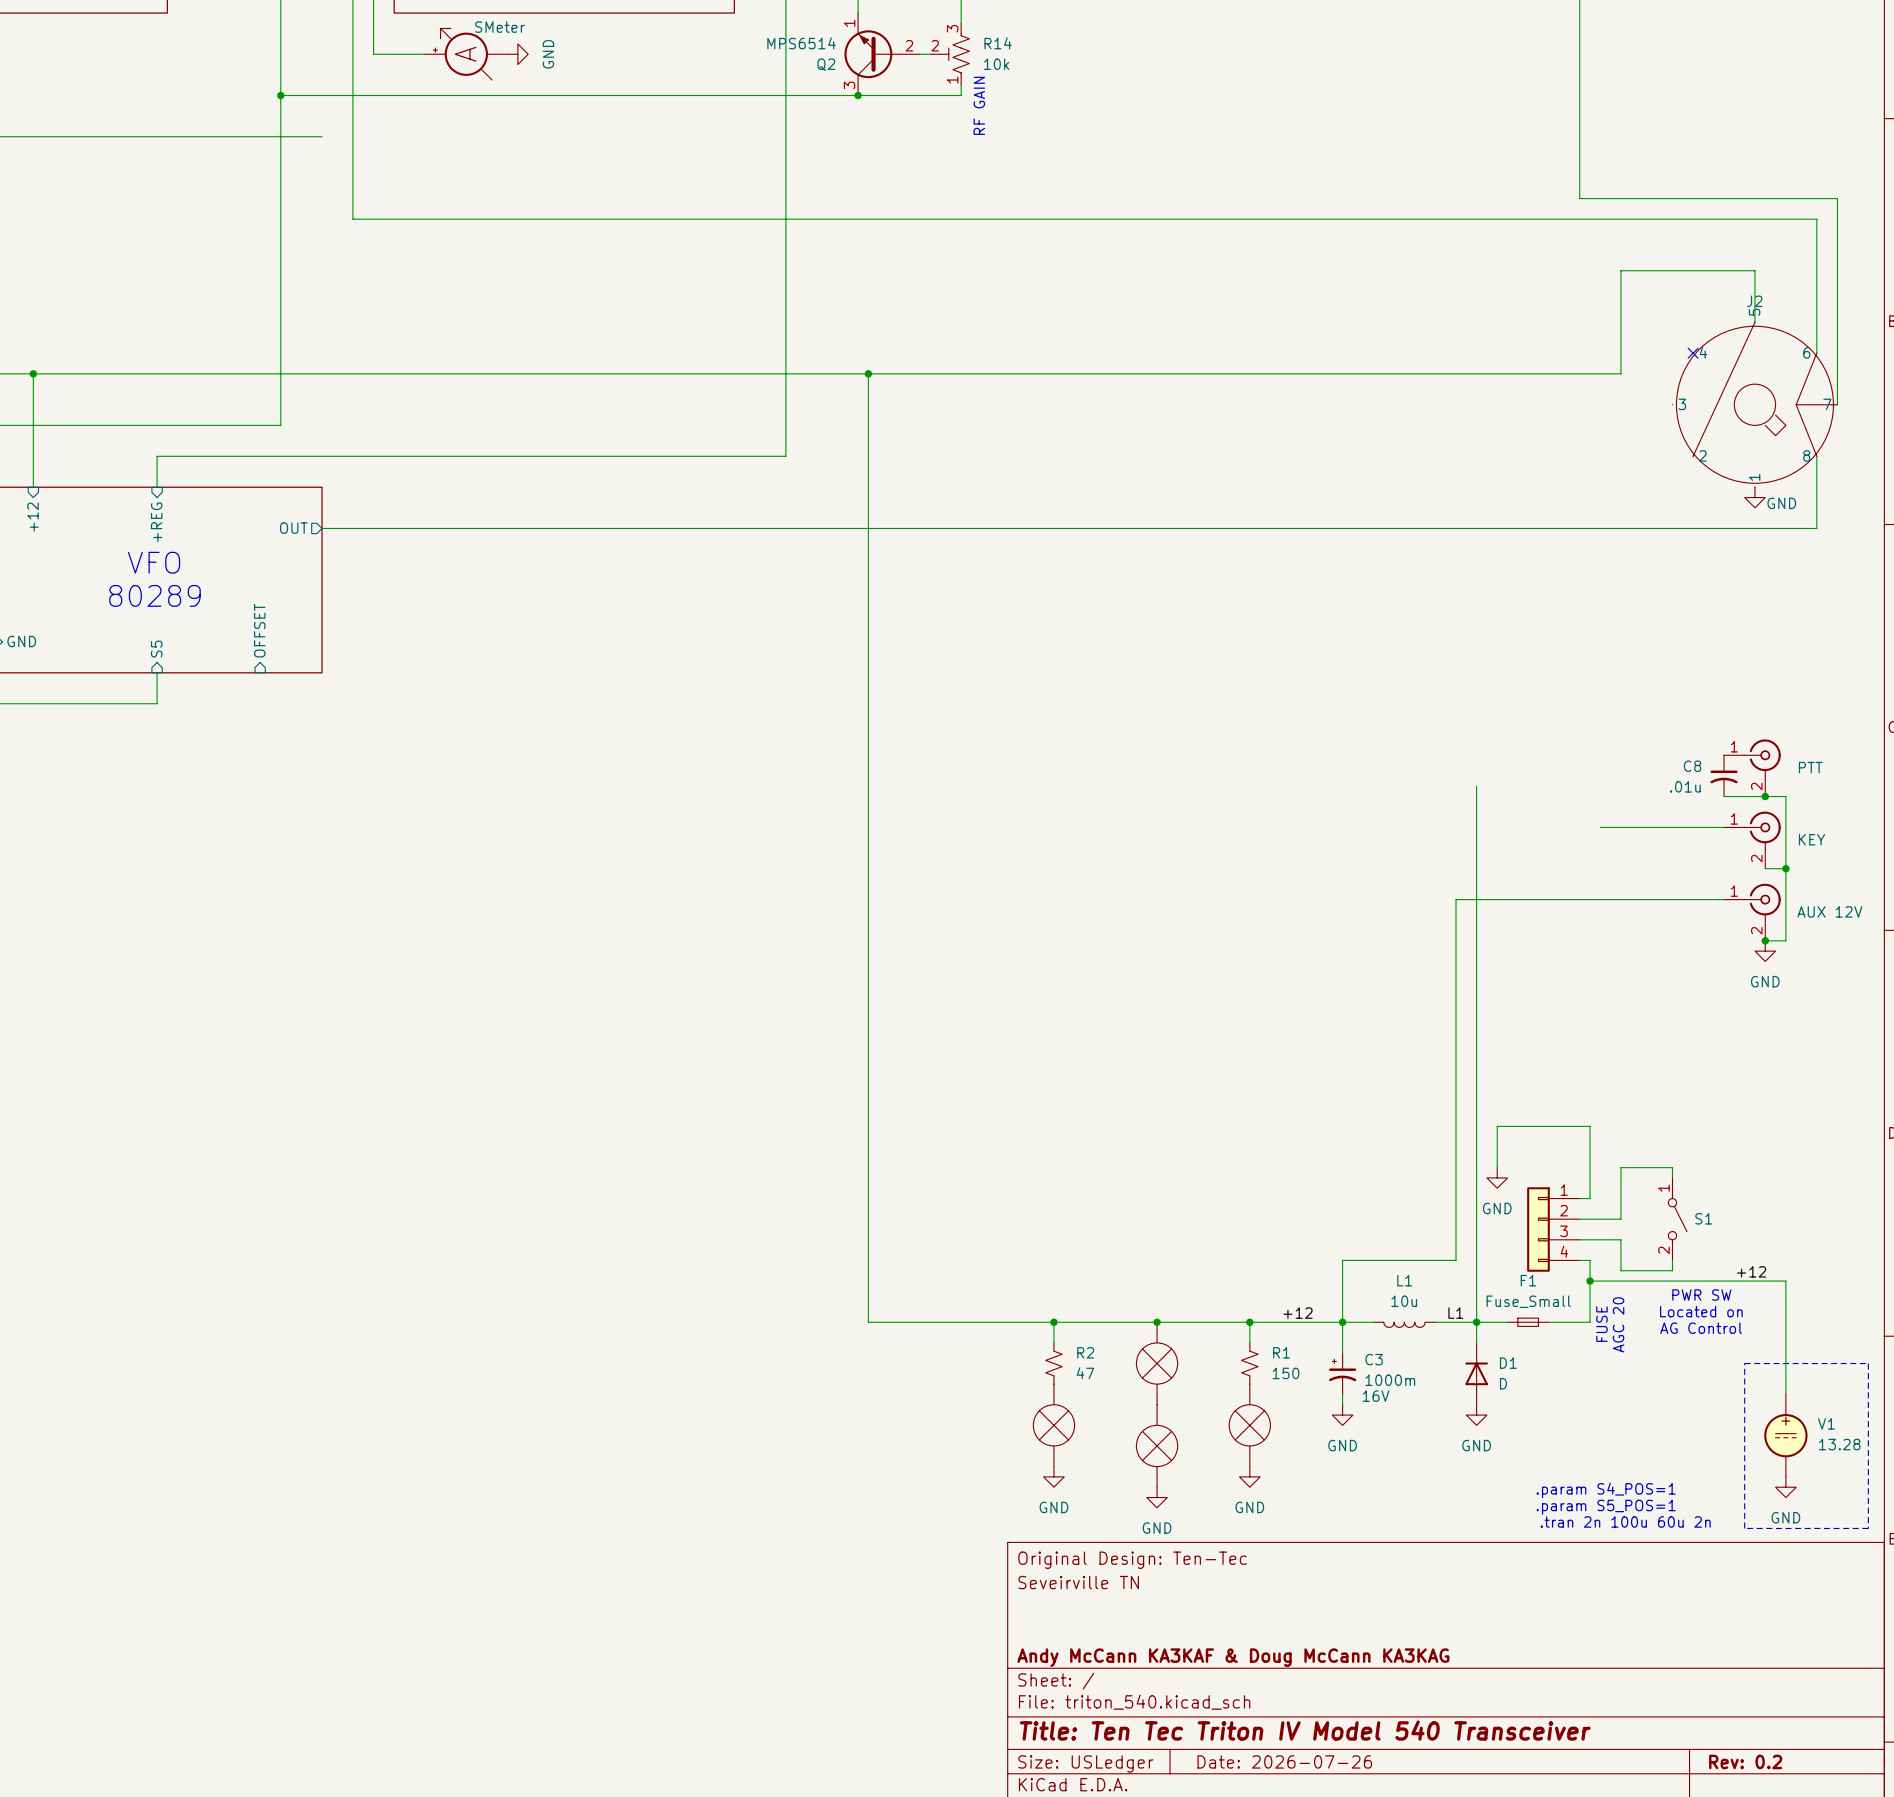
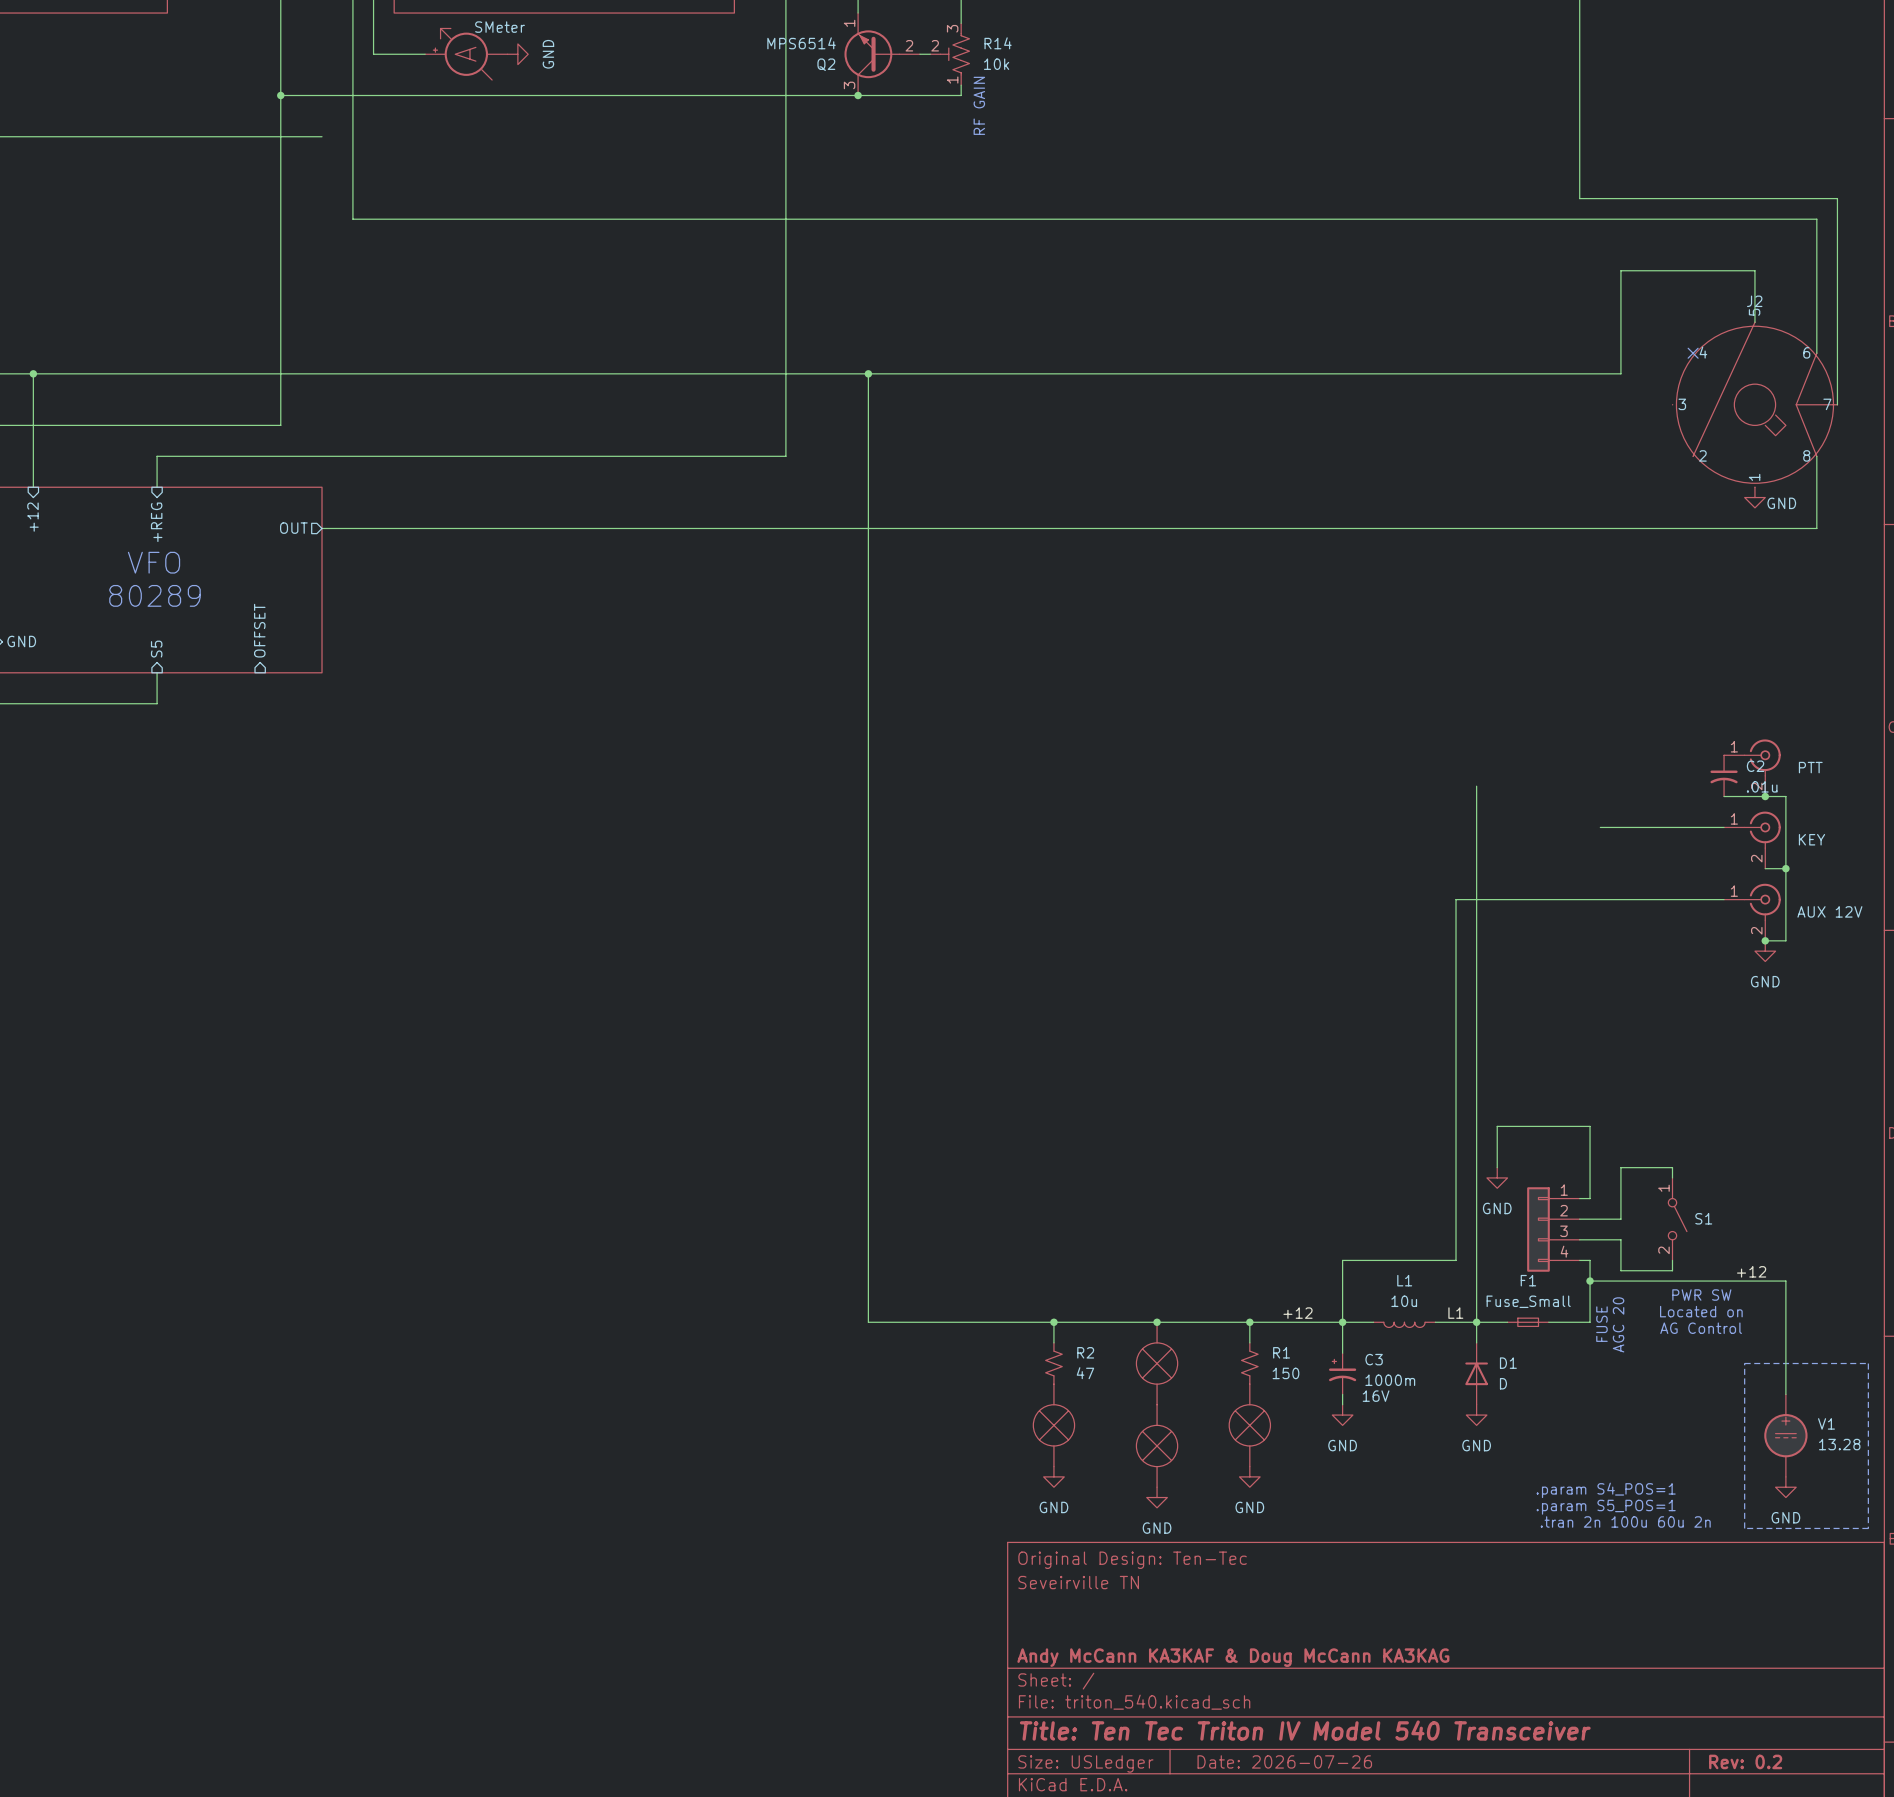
C8 name: C8 (1692, 766) -> C2 (1755, 766)
C8 value position: .01u (1685, 786) -> .01u (1762, 786)

